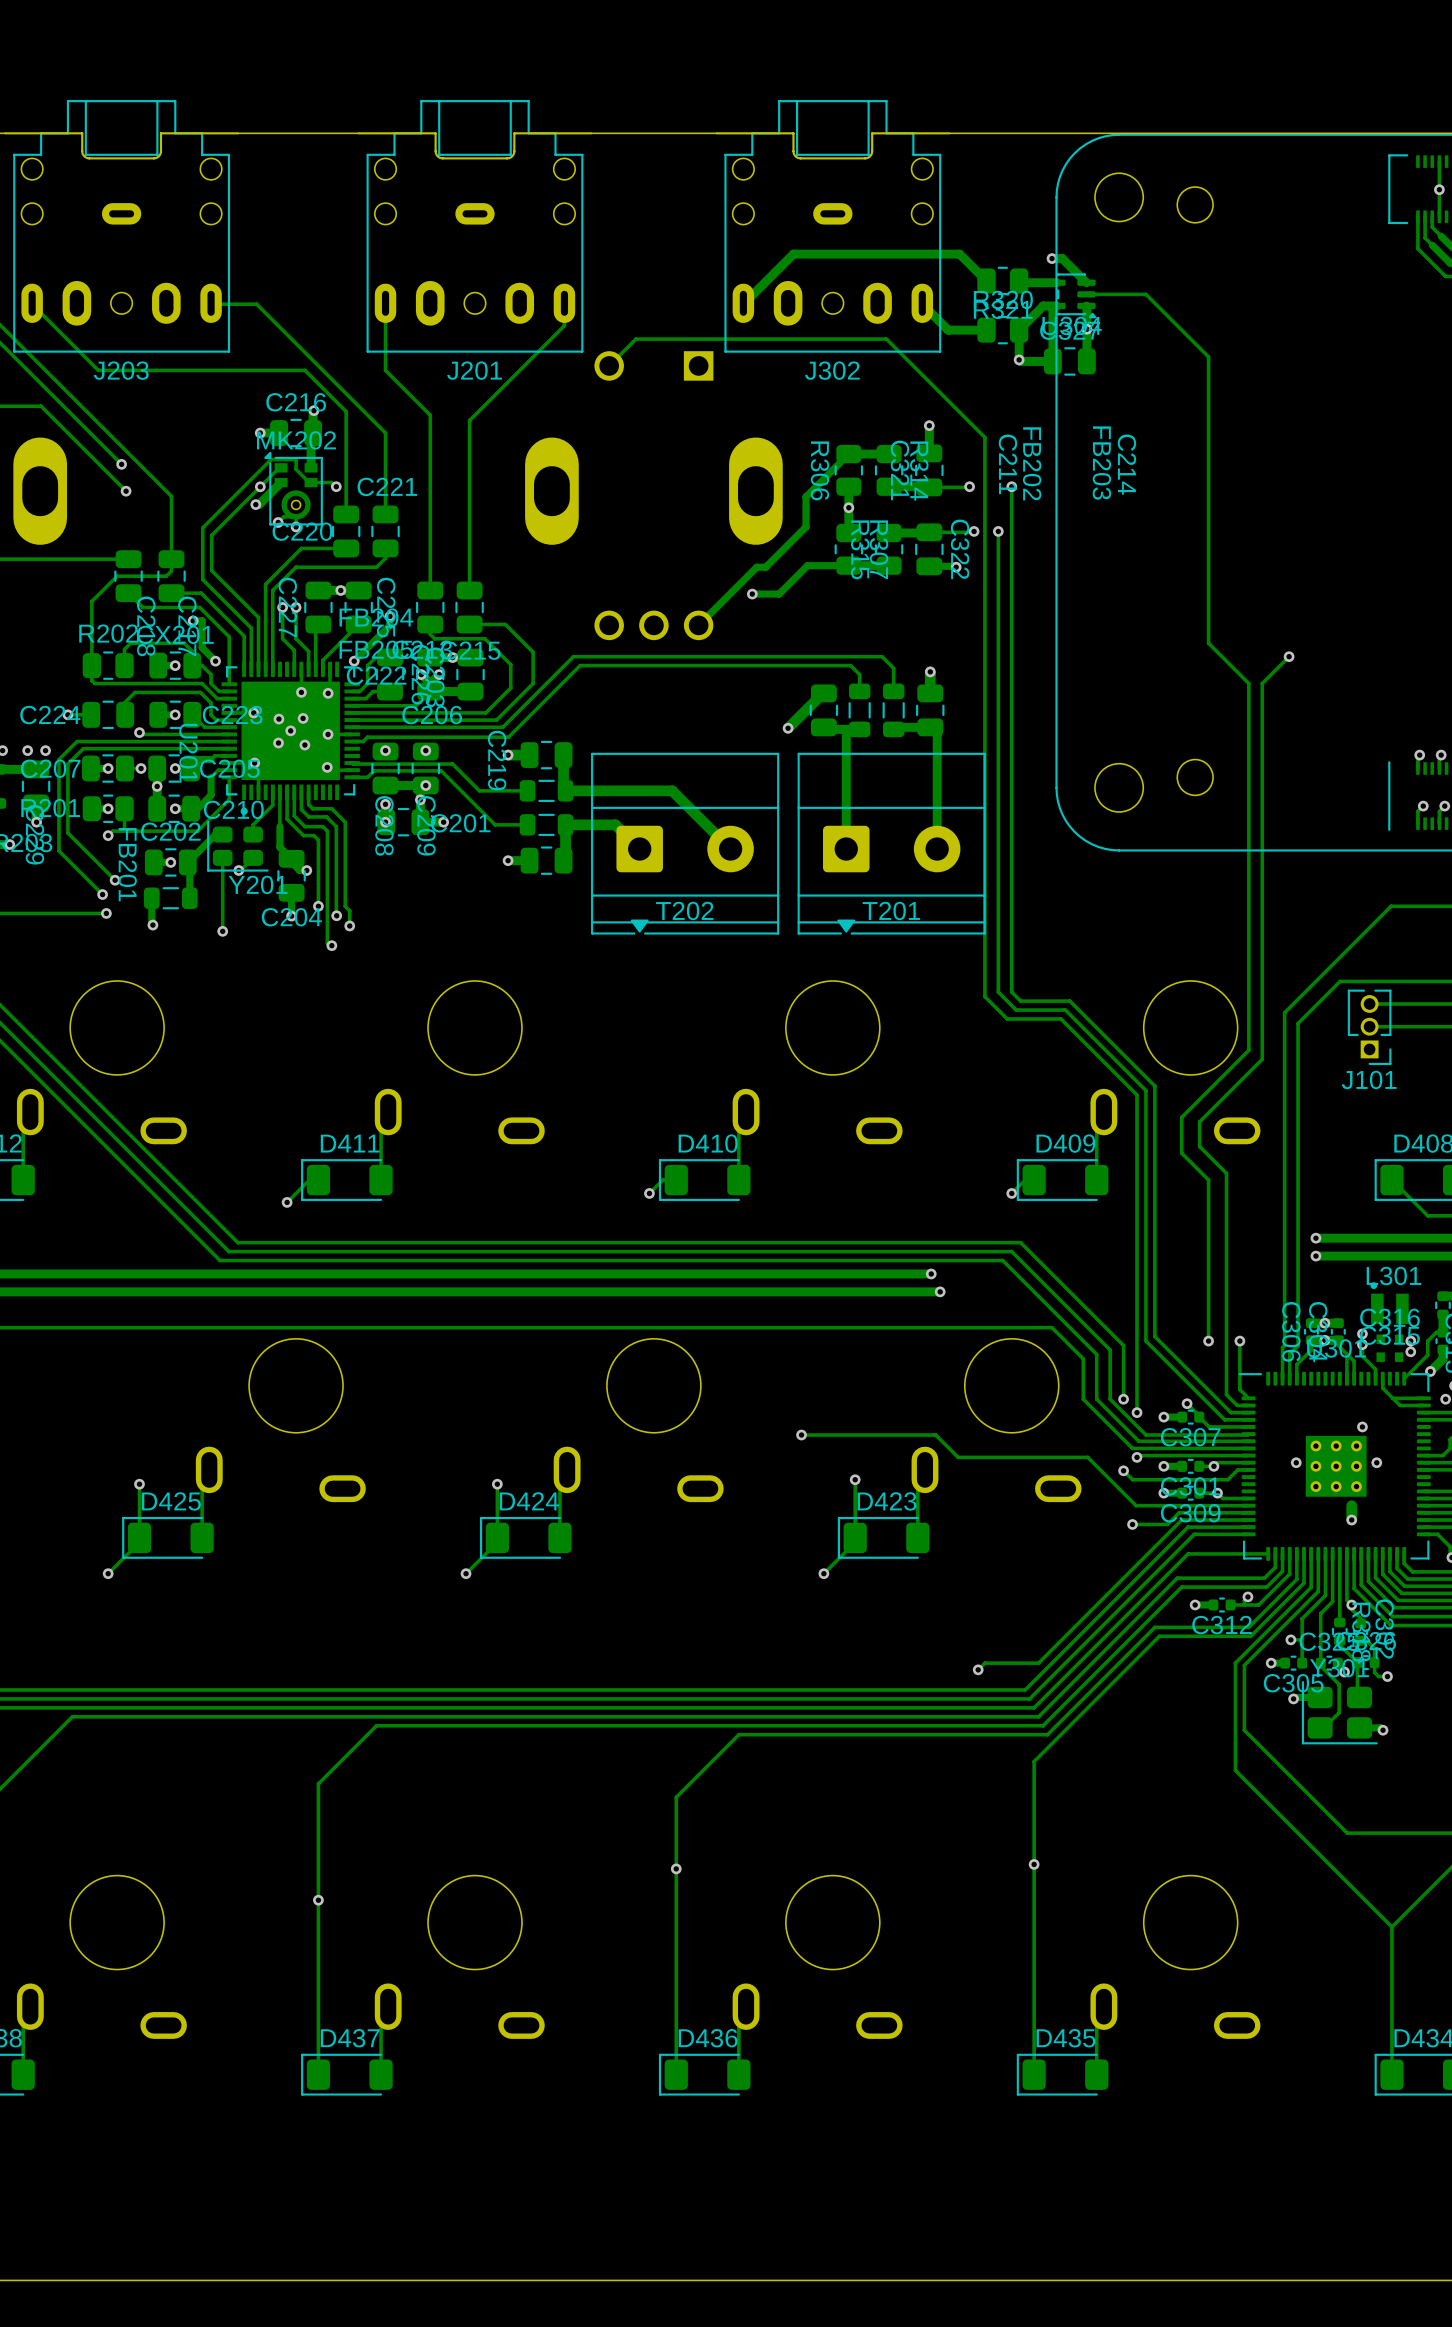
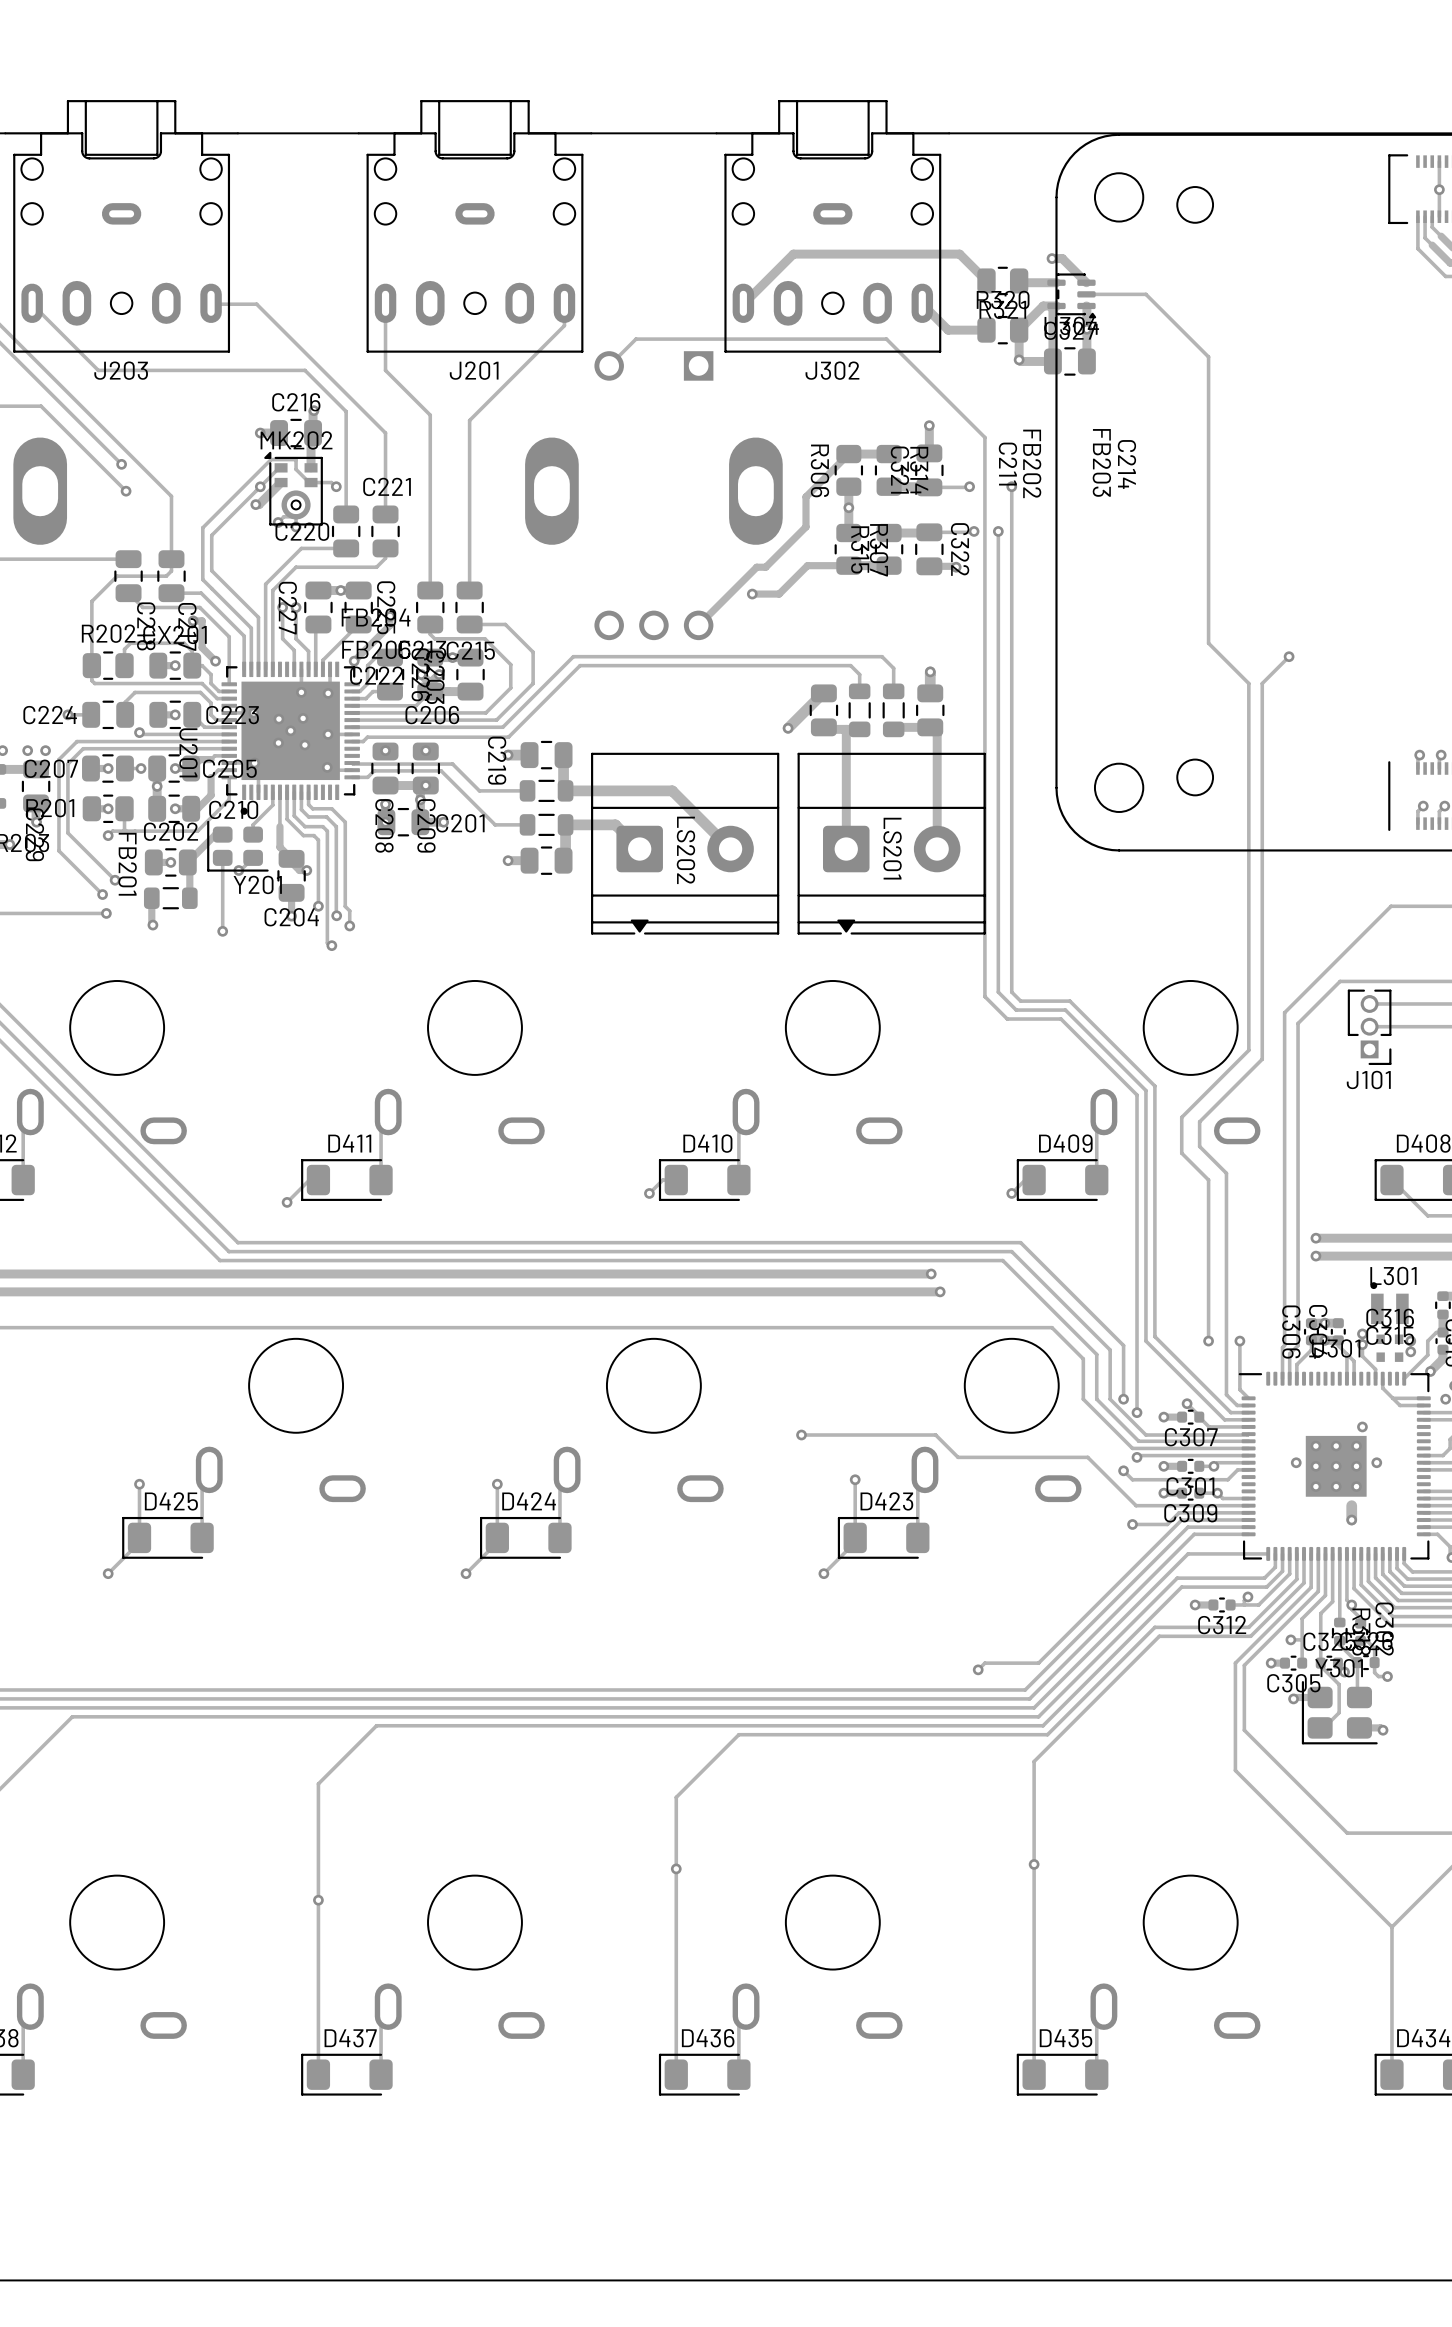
T202 name: T202 (684, 910) -> LS202 (685, 850)
T201 name: T201 (891, 910) -> LS201 (892, 848)

